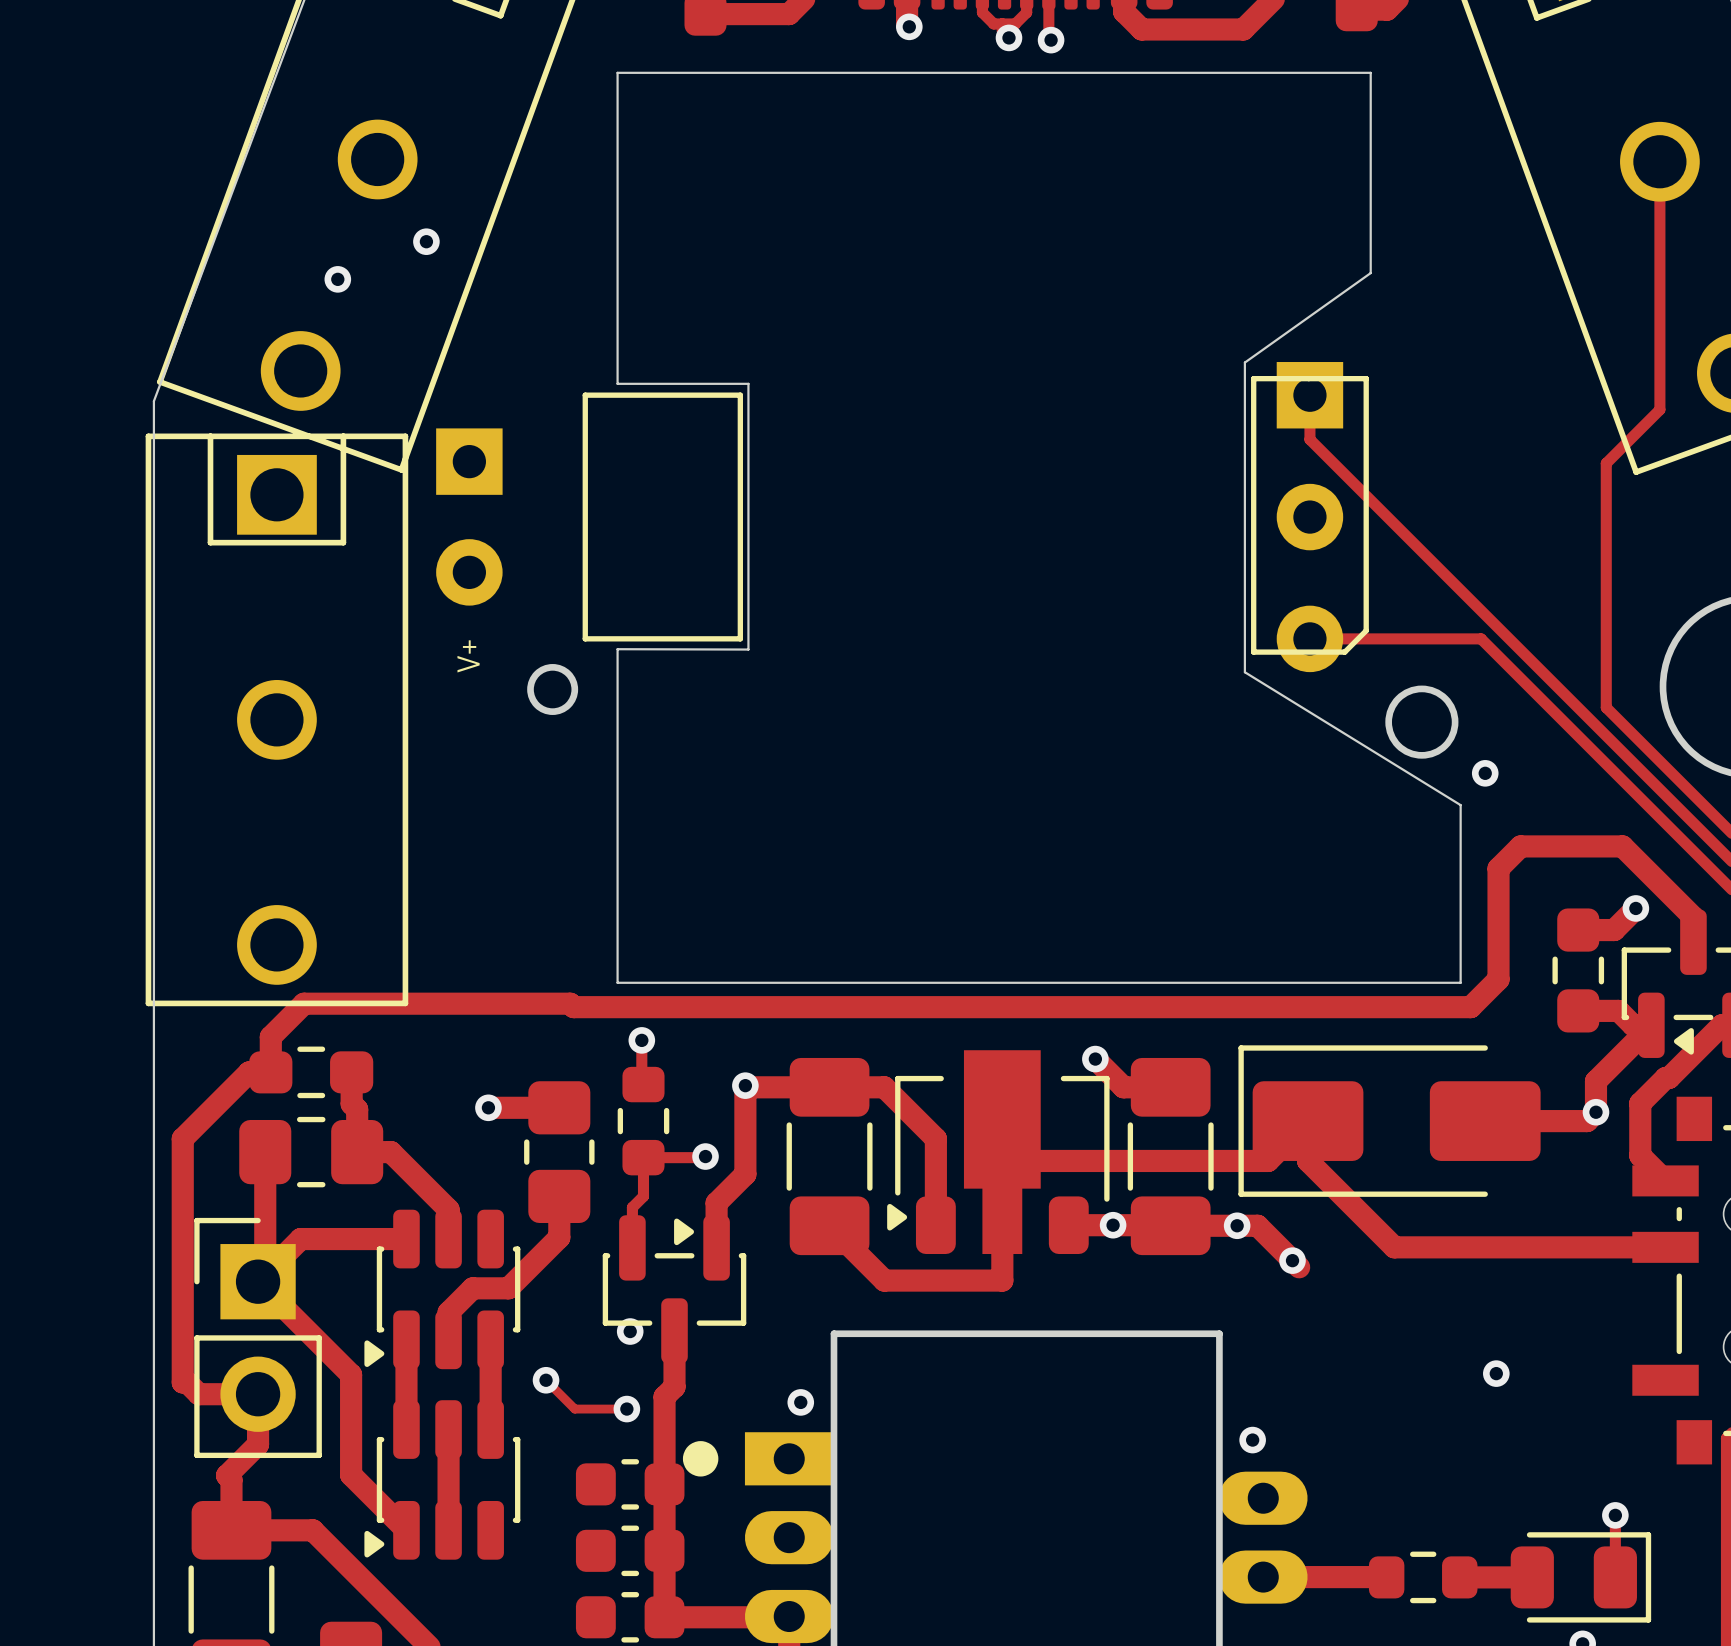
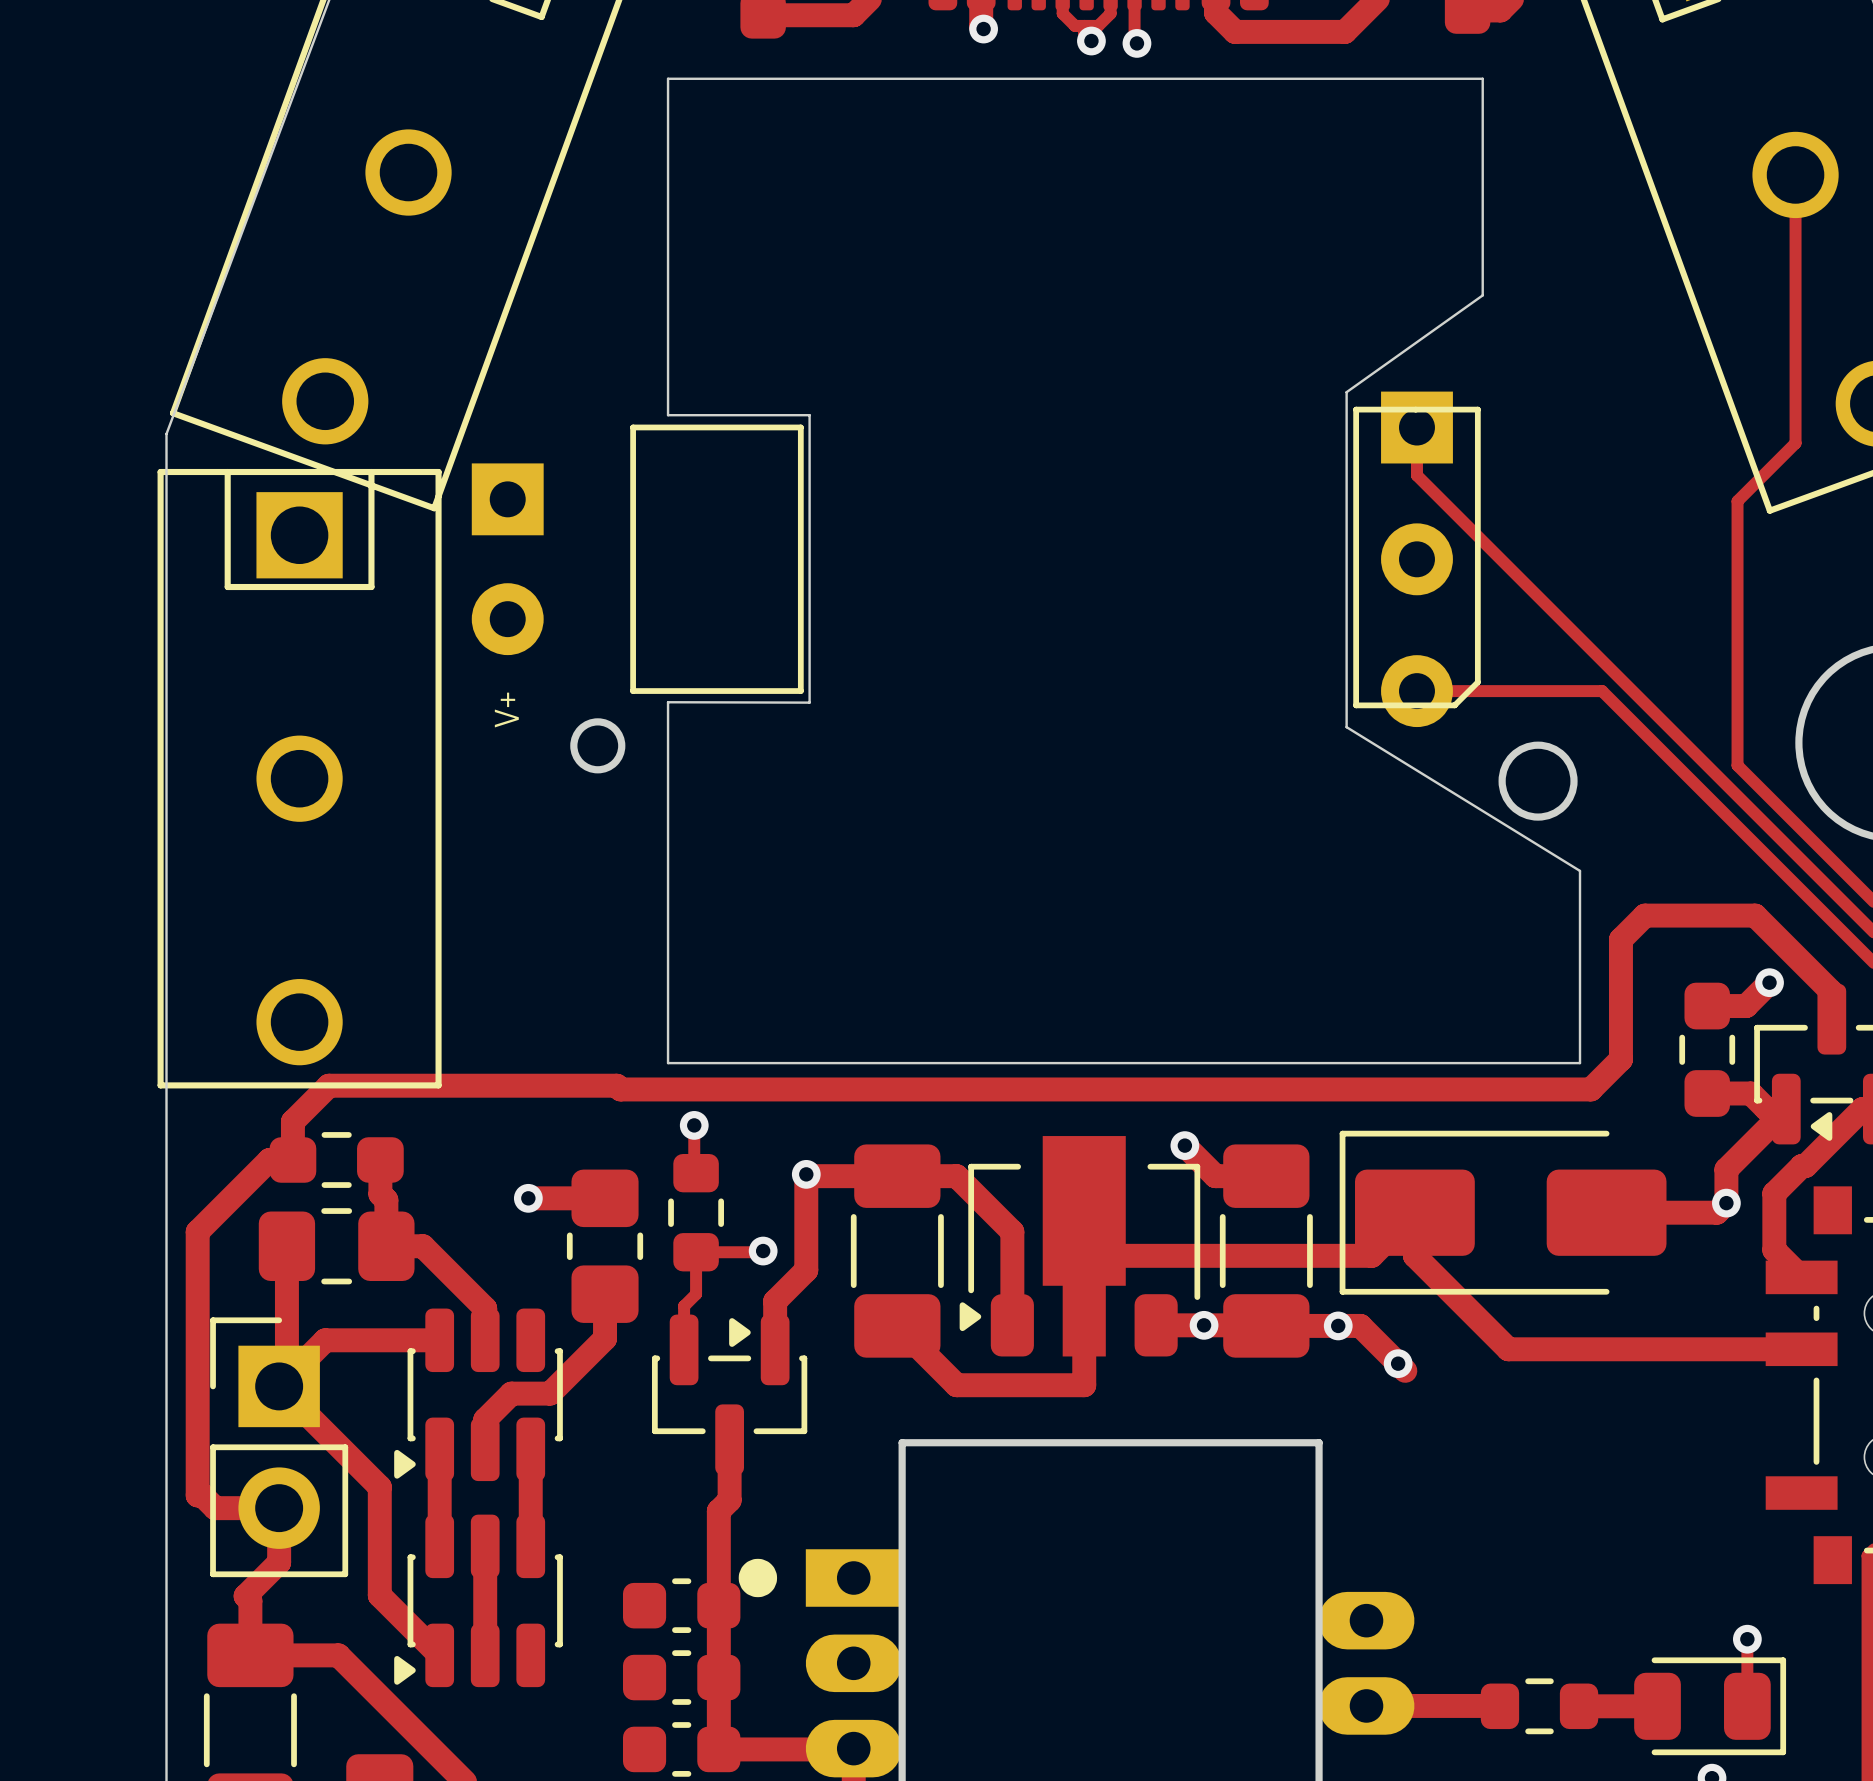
via: (426, 241) -> none
via: (337, 279) -> none
via: (1485, 773) -> none
via: (630, 1331) -> none
via: (1496, 1373) -> none
track: (546, 1380) (574, 1409) (626, 1409) -> none
via: (546, 1380) -> none
via: (800, 1402) -> none
via: (626, 1409) -> none
via: (1252, 1440) -> none

